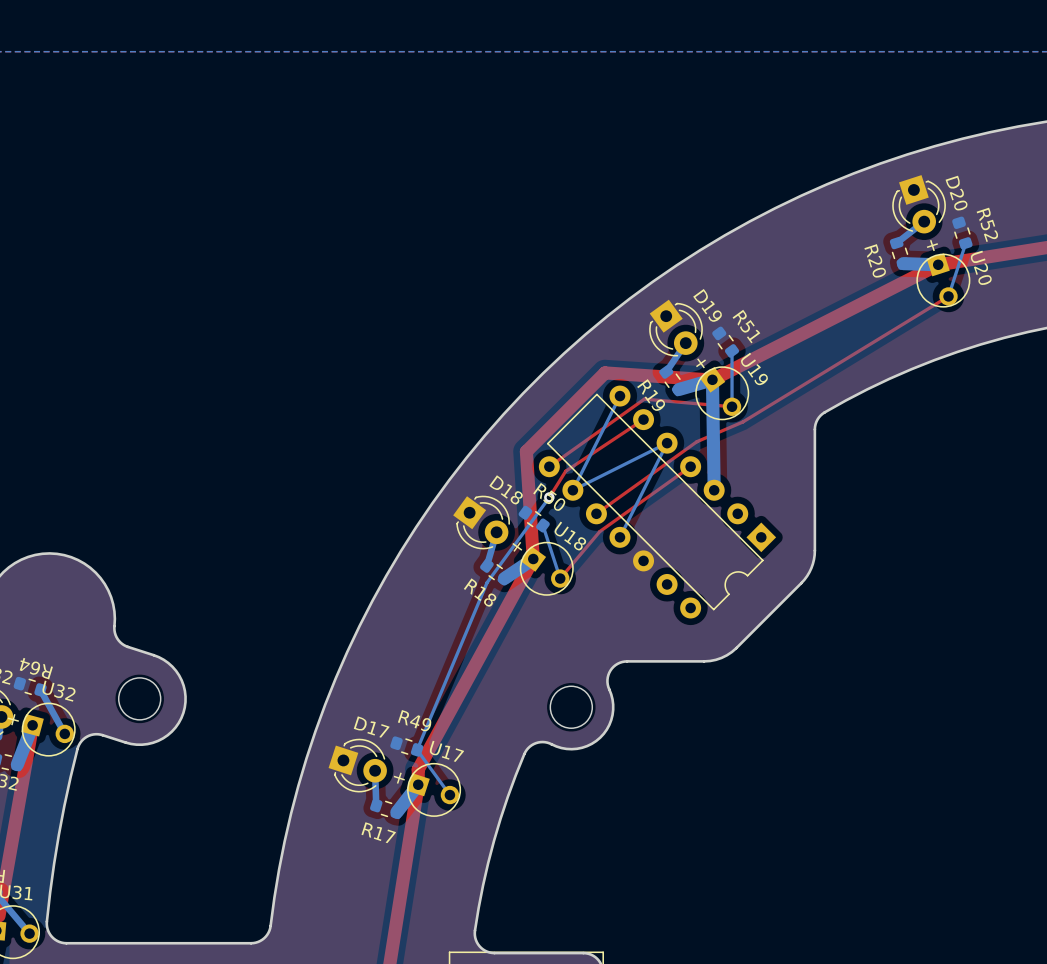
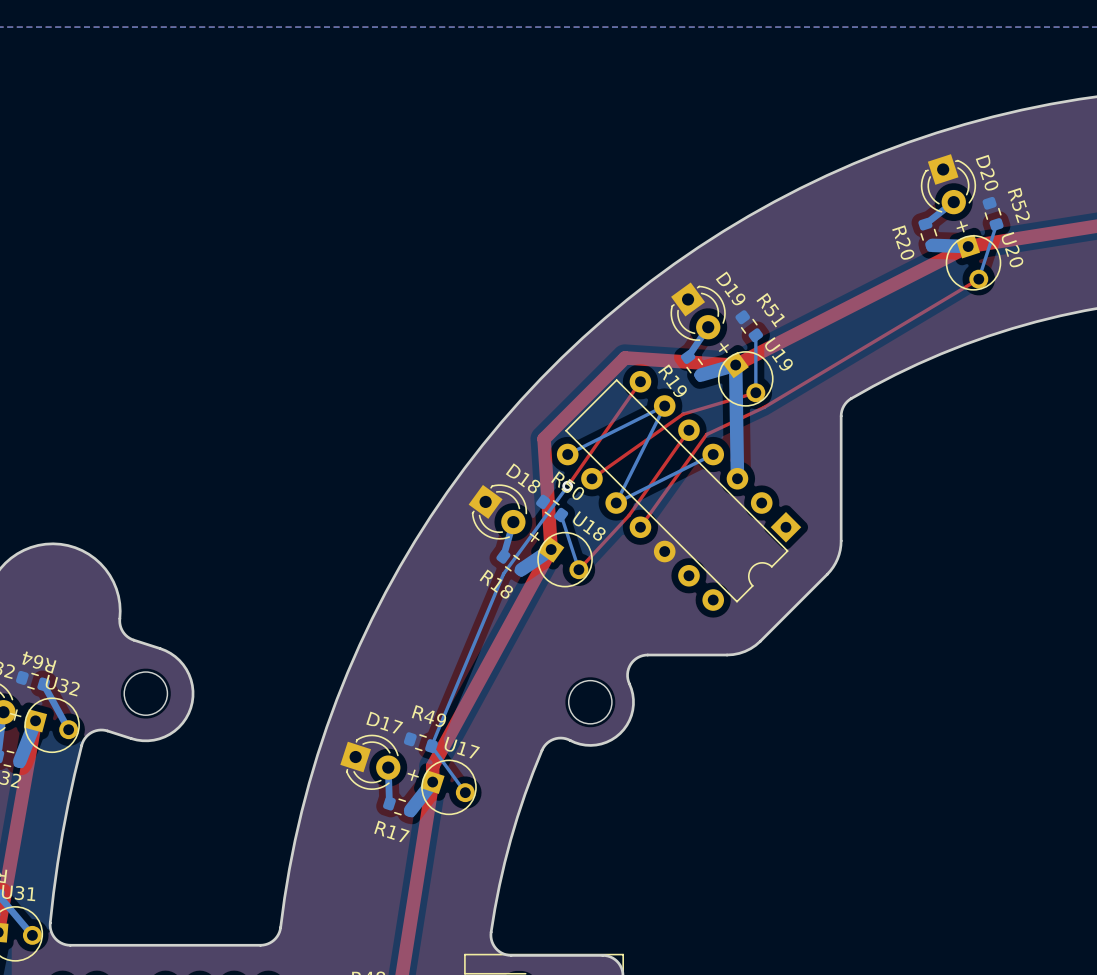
top track: (948, 296) (742, 422) (696, 441) (596, 513) -> (978, 279) (764, 407) (706, 434) (640, 527)
bottom track: (619, 396) (572, 490) (667, 443) (619, 537) -> none
top track: (732, 406) (644, 399) (549, 466) -> (755, 392) (683, 414) (591, 478)
top track: (643, 419) (565, 471) (549, 497) -> (640, 381) (567, 486)
top track: (690, 466) (599, 531) (560, 578) -> (688, 430) (629, 515) (578, 569)
bottom track: none -> (713, 454) (616, 503) (664, 406) (567, 454)

